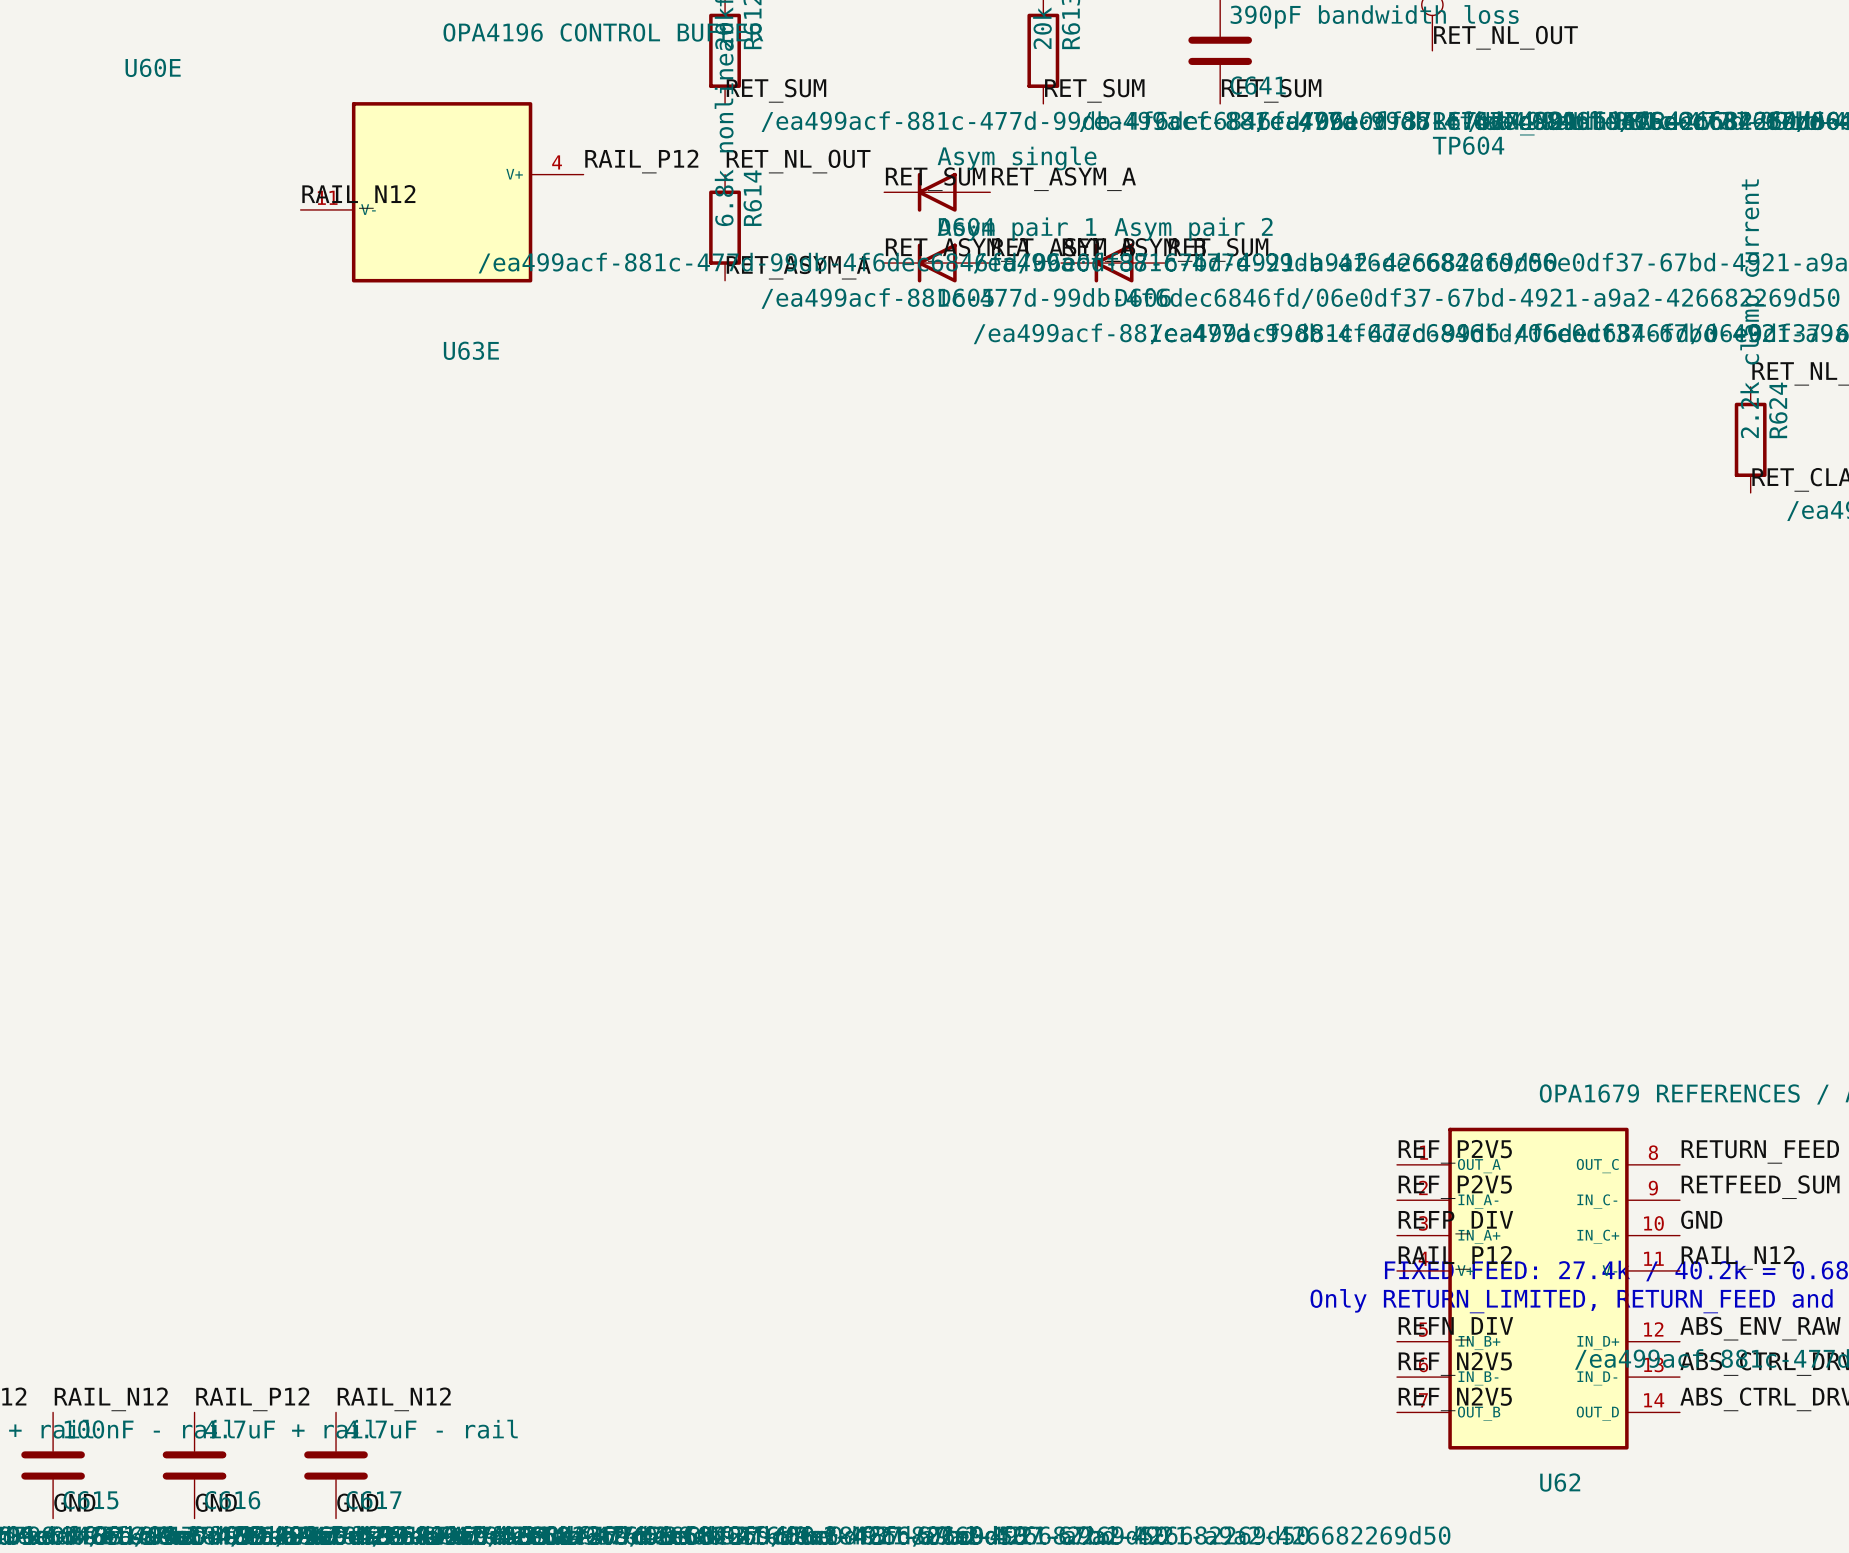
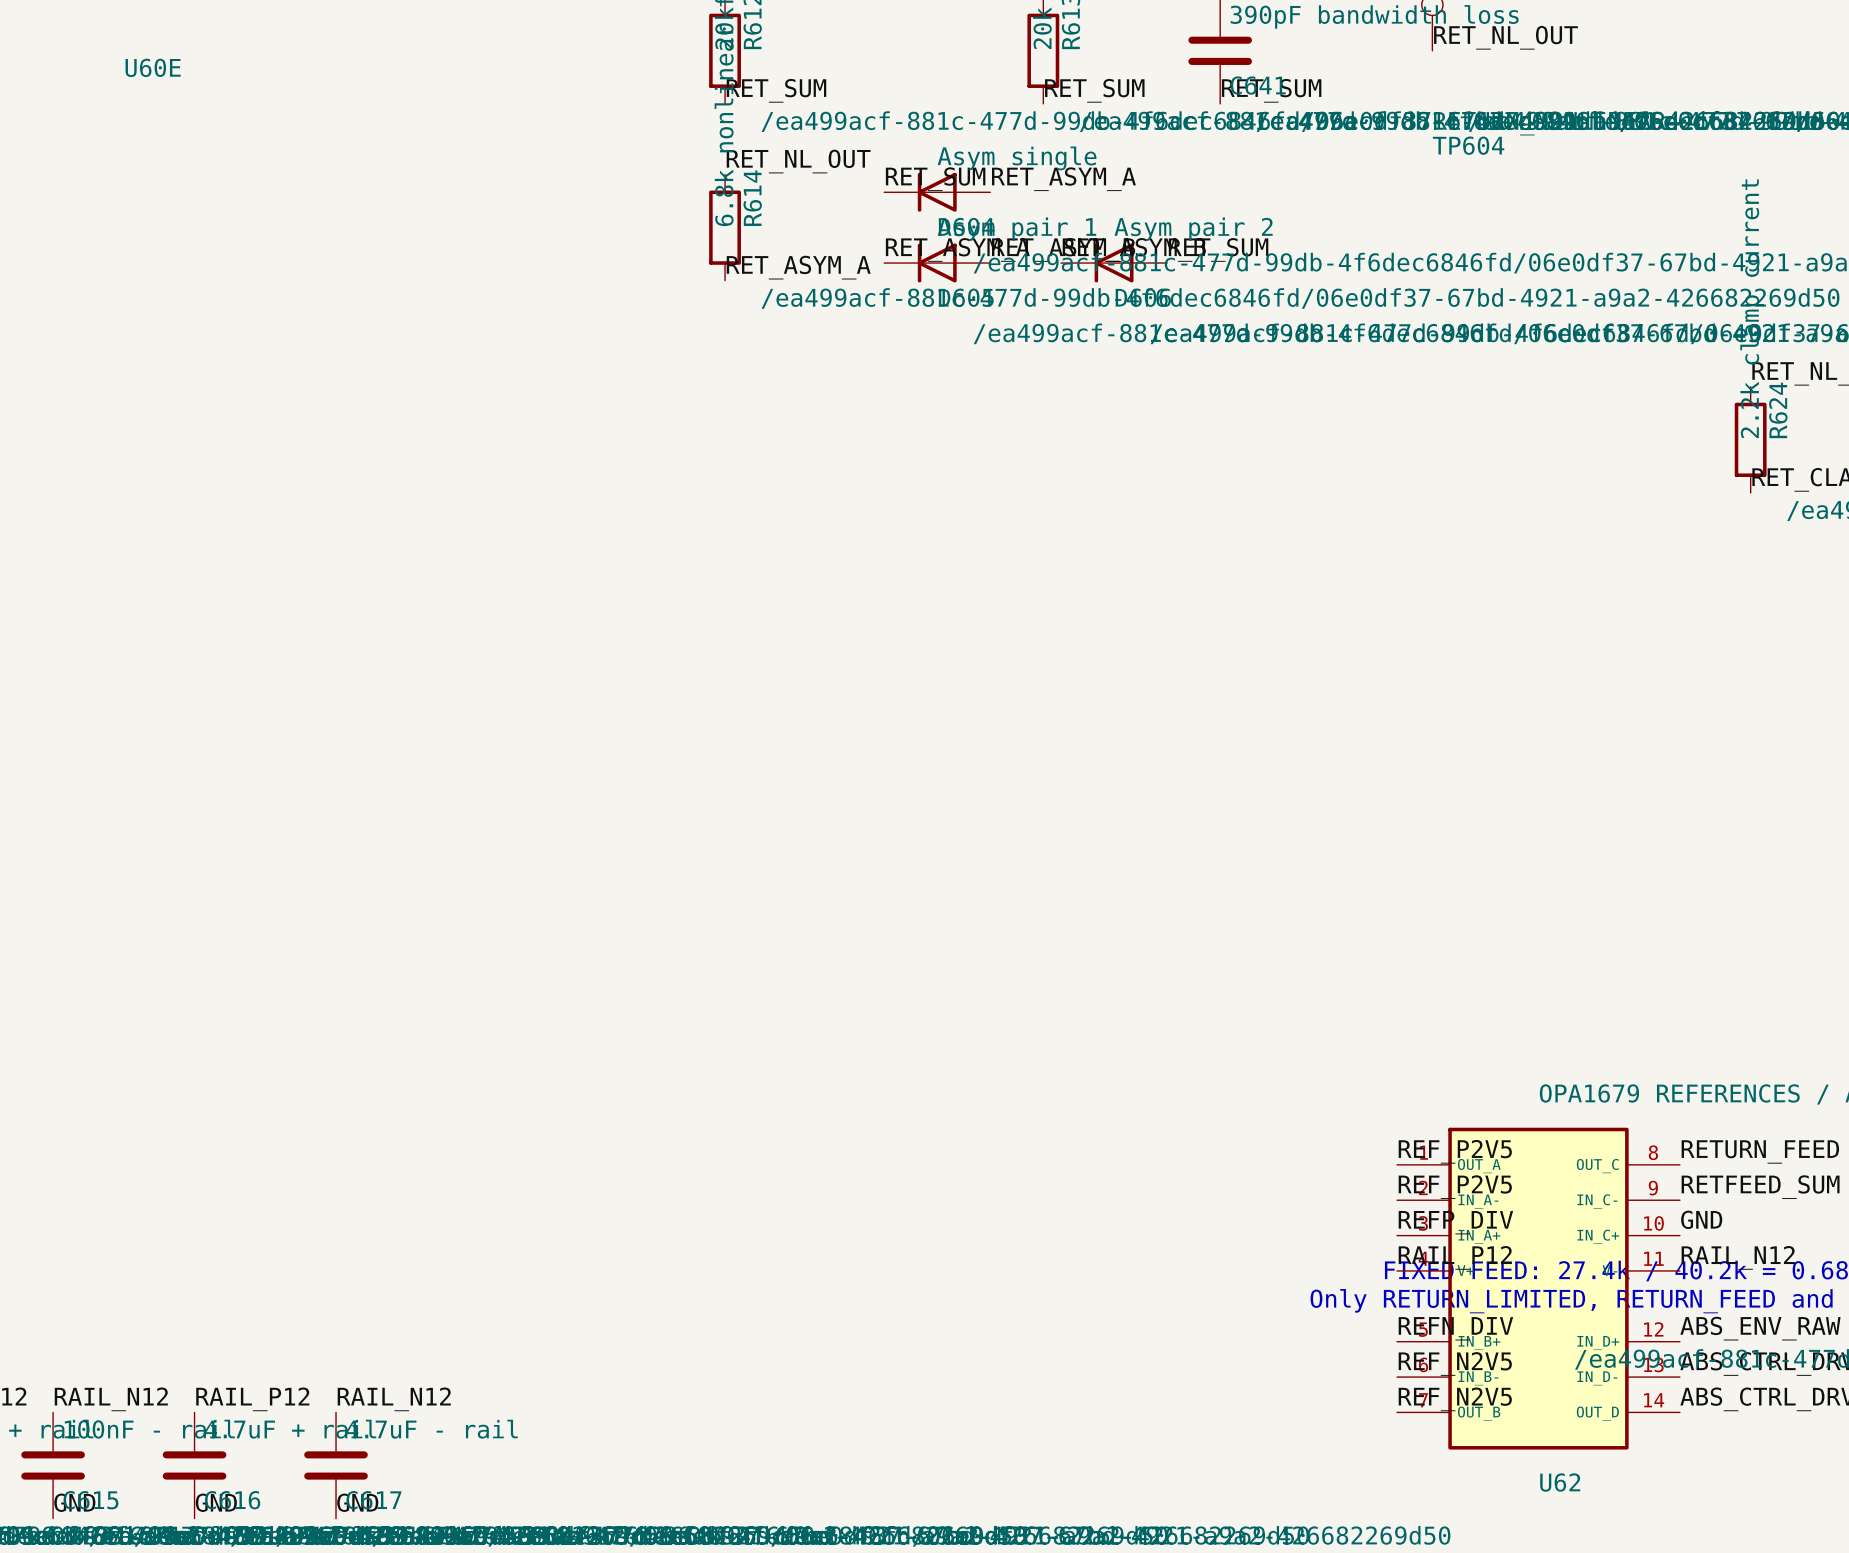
label: RAIL_P12 (641, 161) -> none
U63E: OPA4196 CONTROL BUFFER (442, 192) -> none
label: RAIL_N12 (358, 196) -> none

